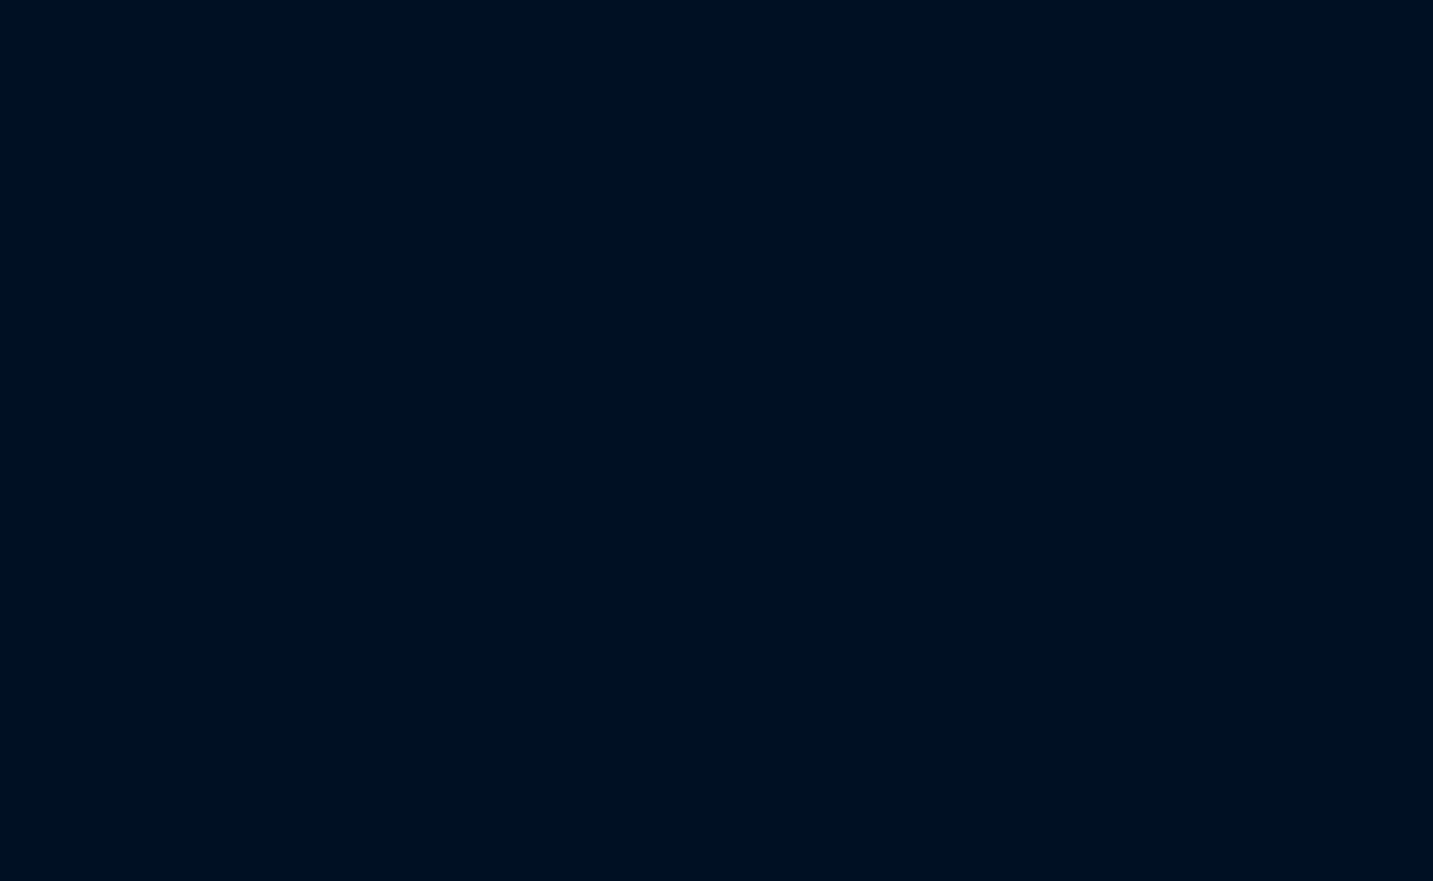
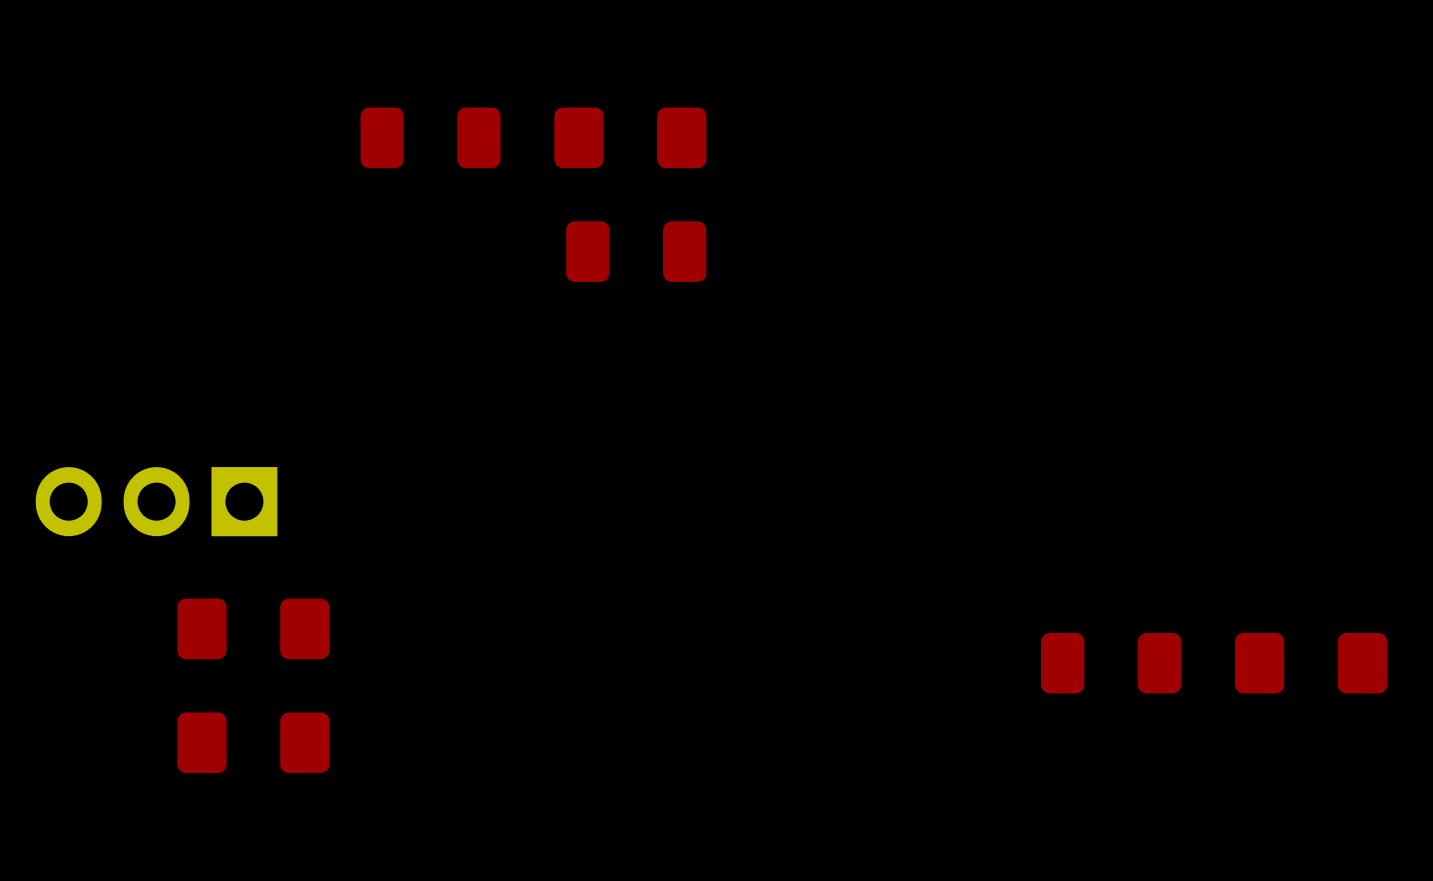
part: none -> (430, 137)
part: none -> (630, 137)
part: none -> (636, 251)
part: none -> (156, 501)
part: none -> (253, 628)
part: none -> (1111, 663)
part: none -> (1311, 663)
part: none -> (253, 742)

